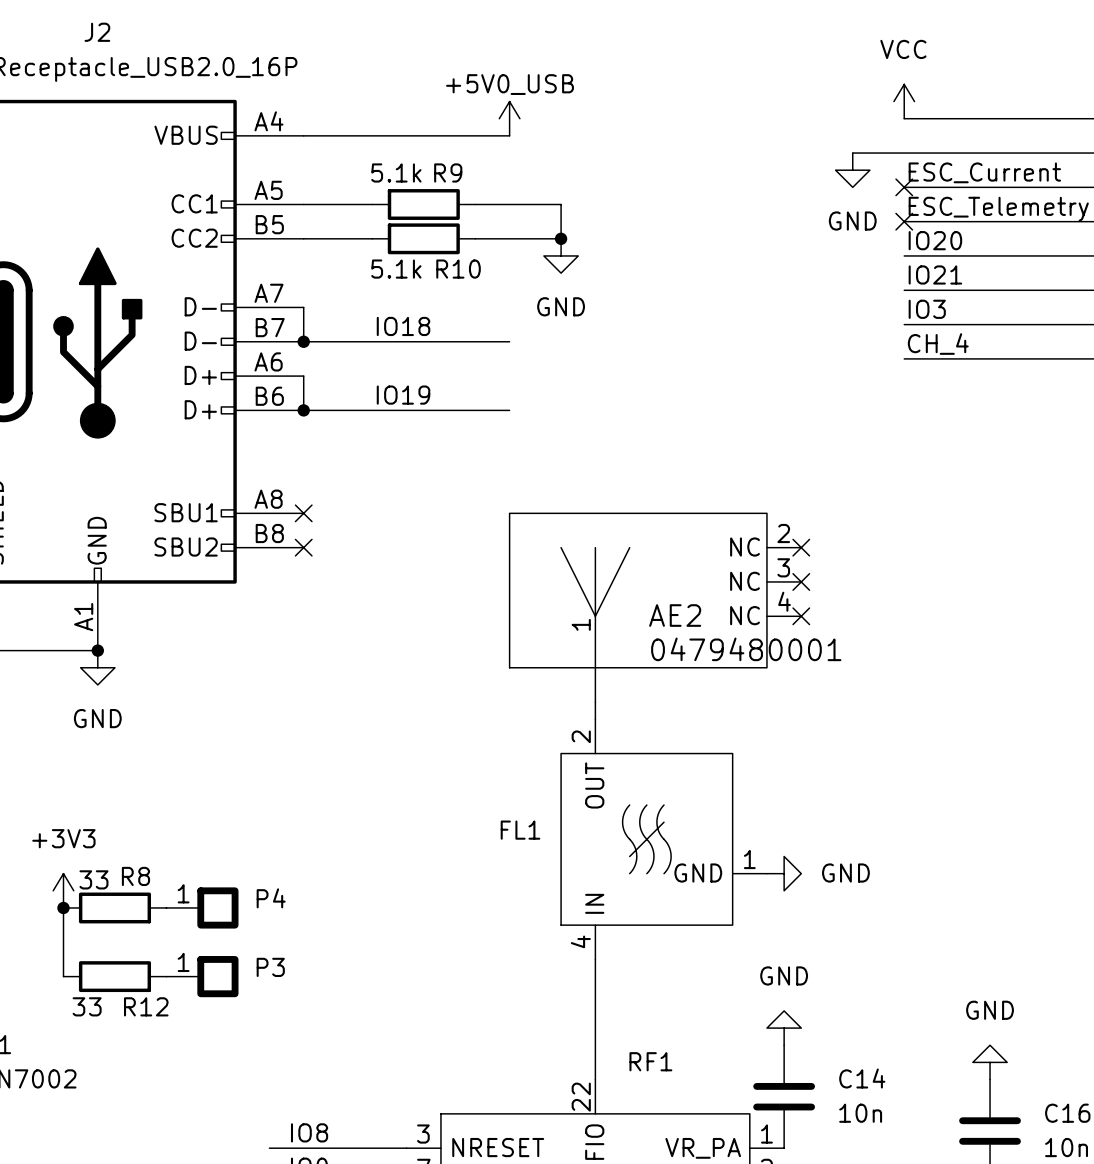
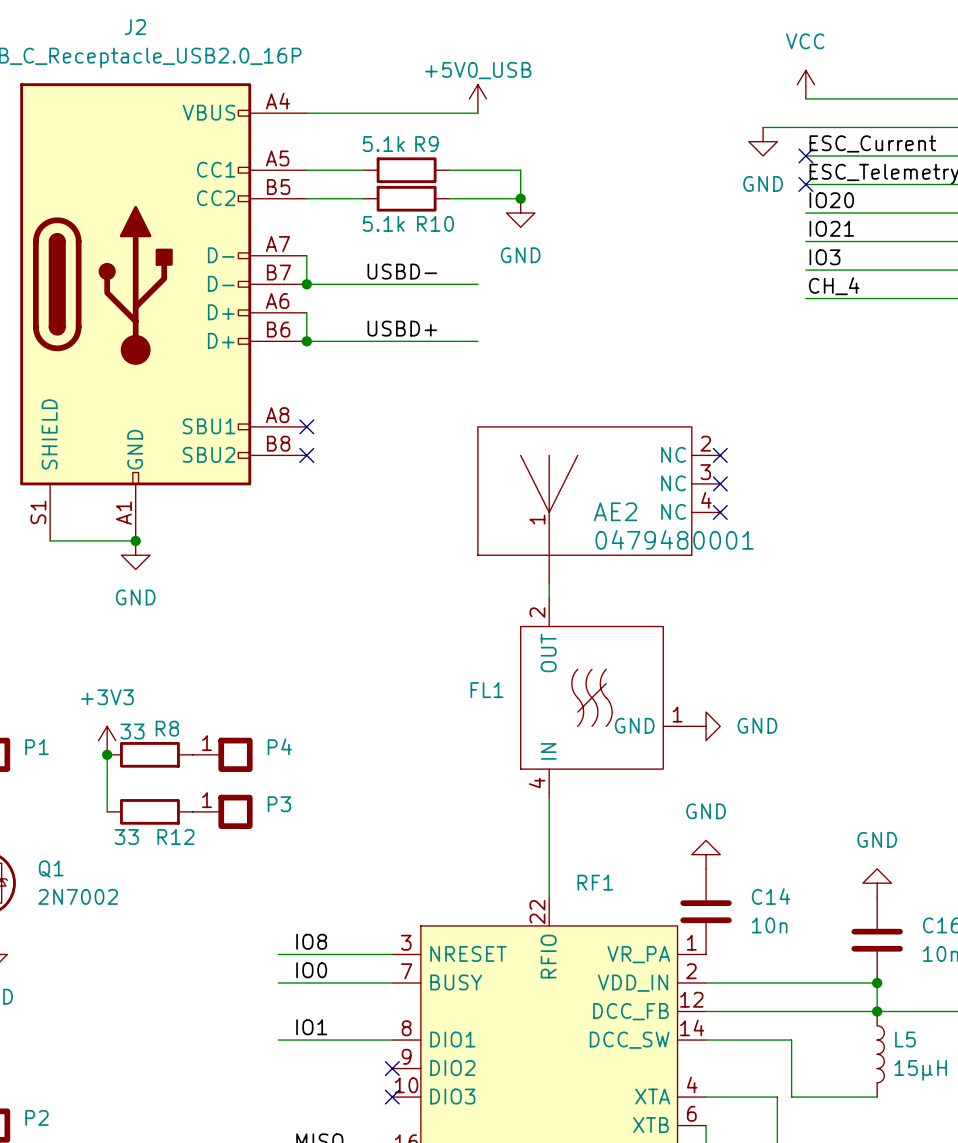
label: IO18 (403, 326) -> USBD- (402, 271)
label: IO19 (403, 395) -> USBD+ (402, 328)

